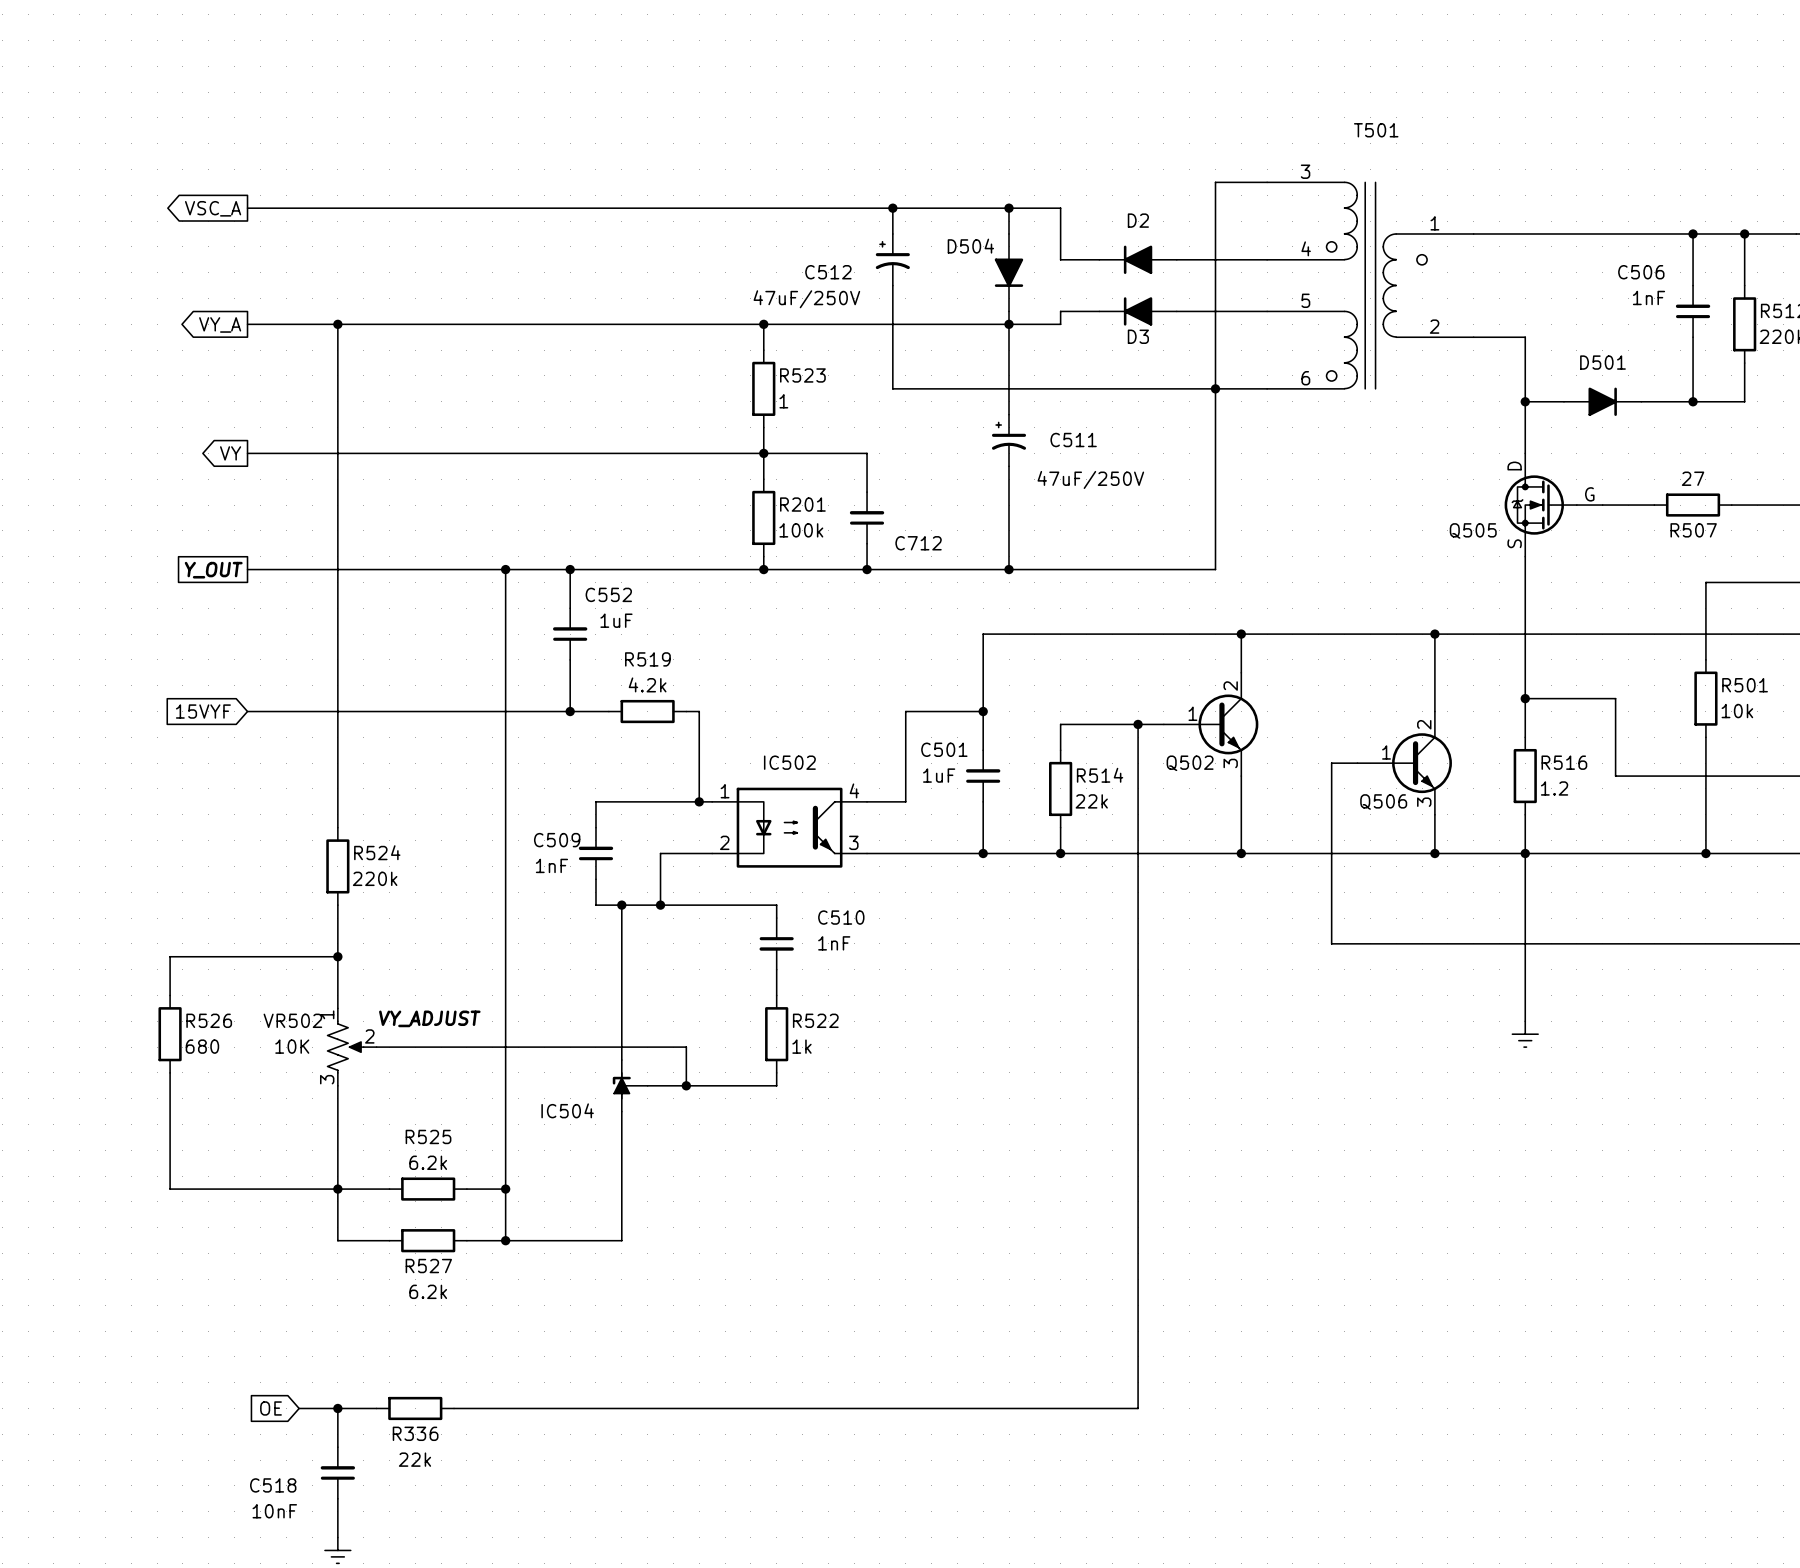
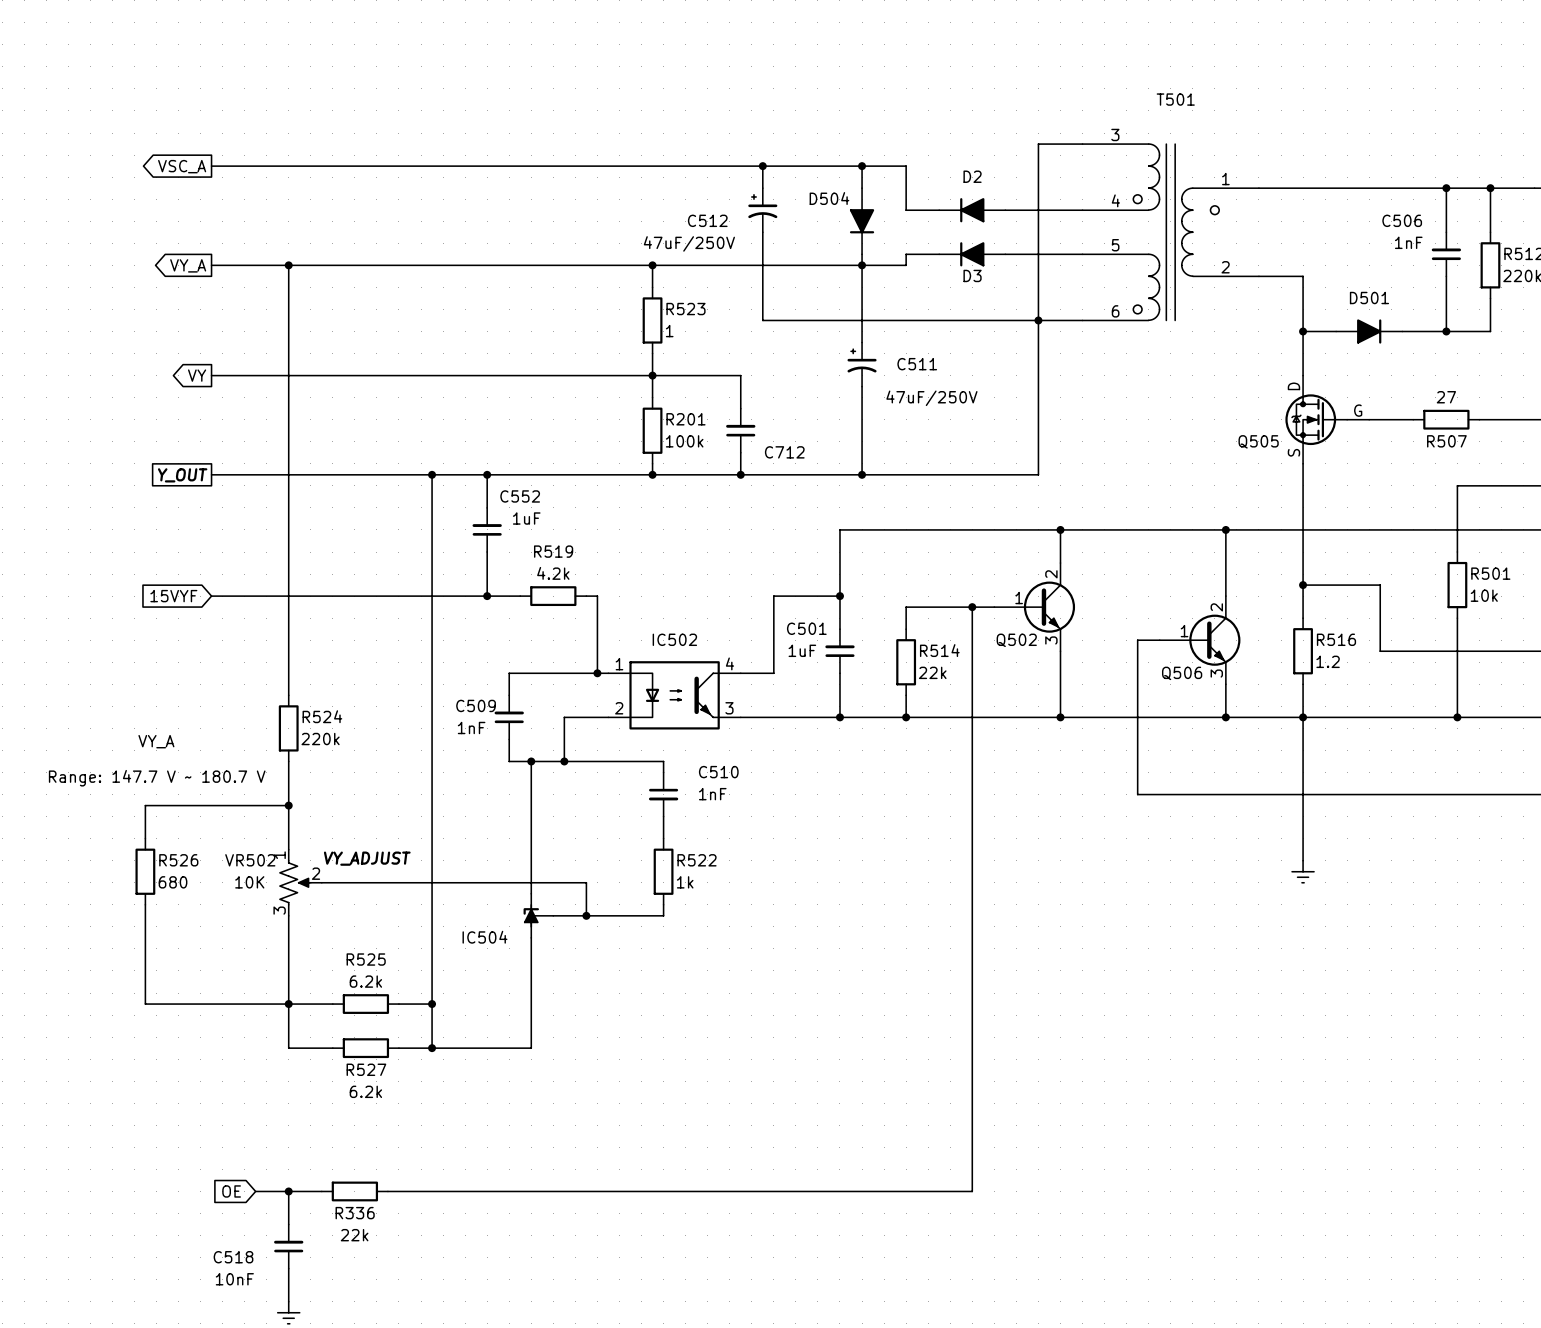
text: none -> VY_A (156, 741)
text: none -> Range: 147.7 V ~ 180.7 V (157, 778)

